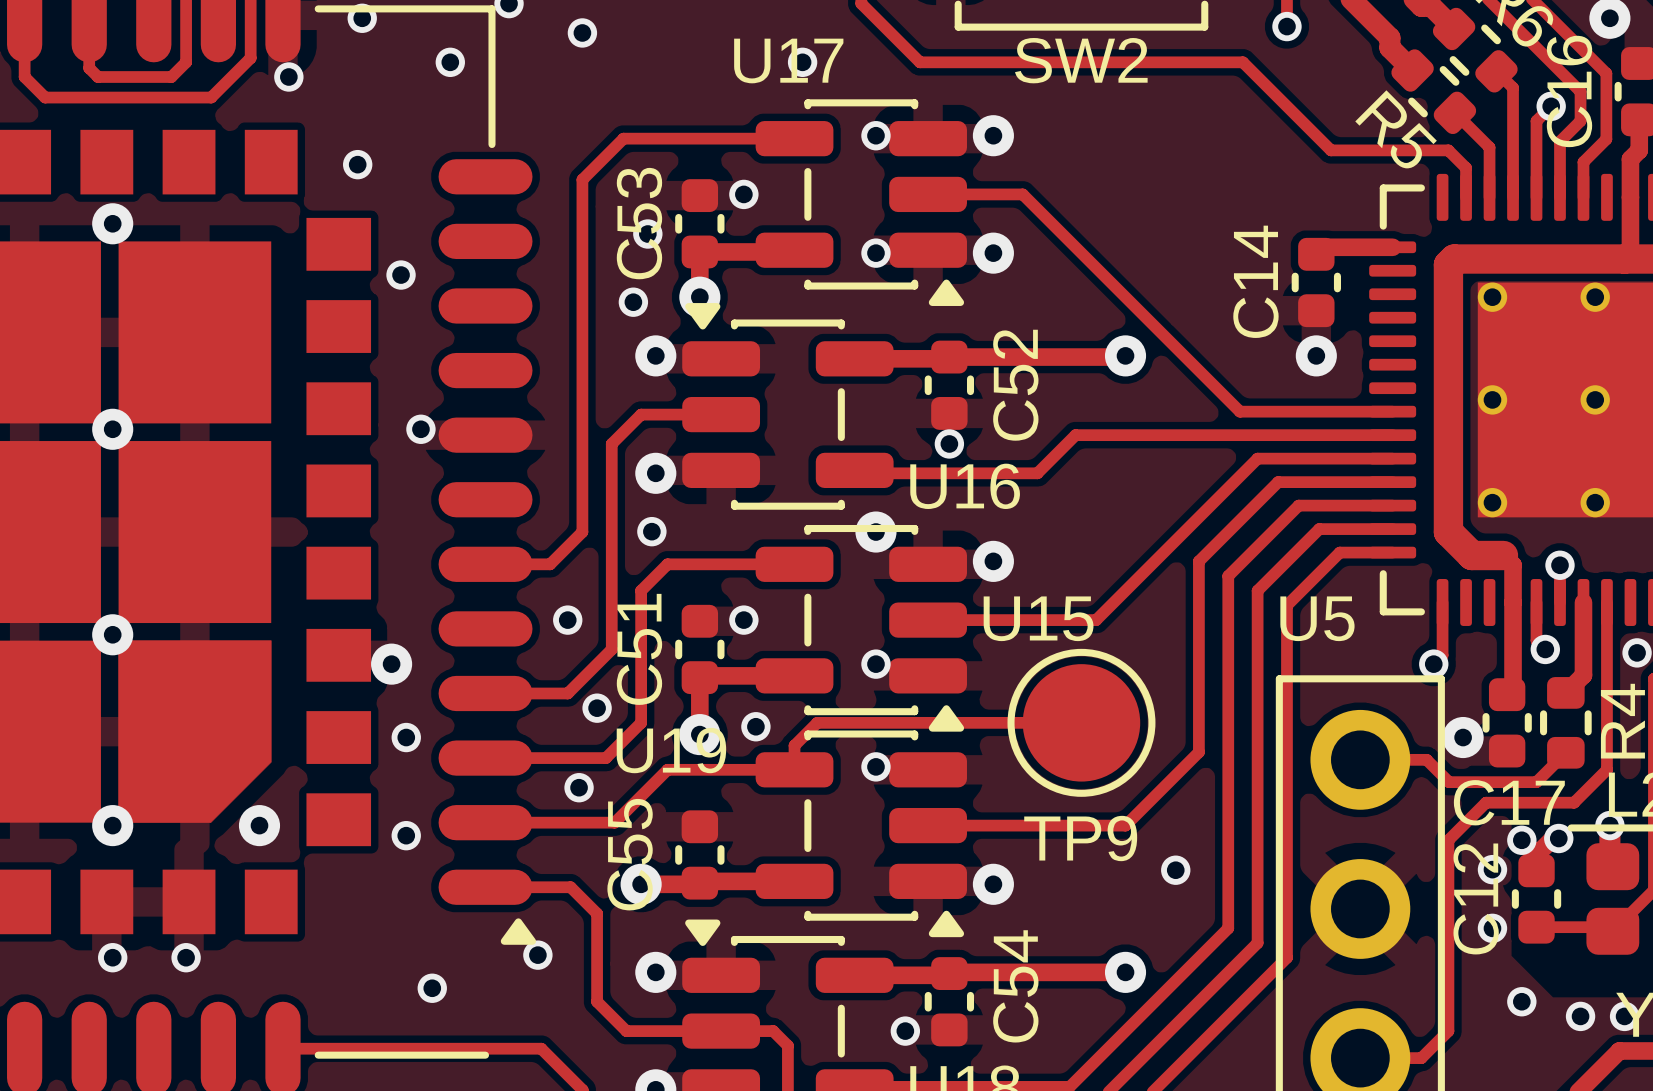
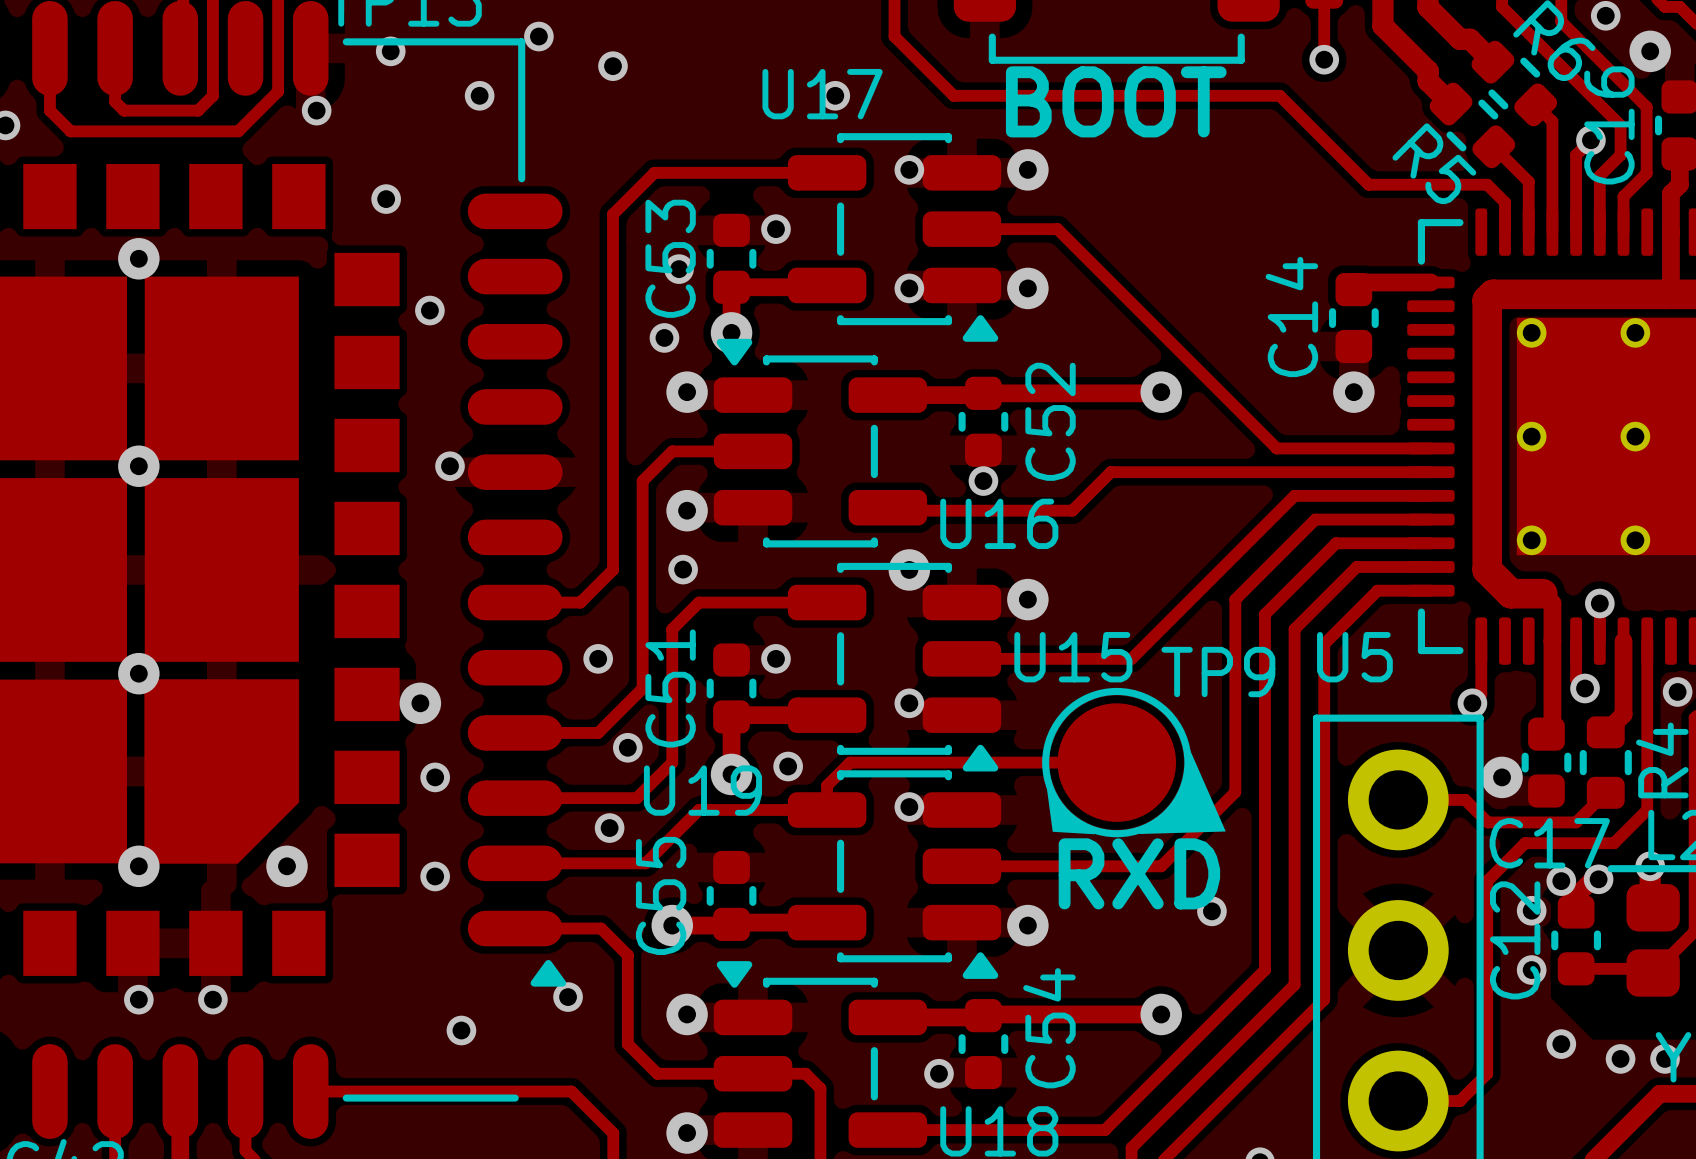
SW2 name: SW2 (1081, 60) -> none
text: none -> BOOT (1116, 101)
drawing: none -> [1044, 742, 1226, 835]
text: none -> RXD (1139, 873)
TP9 name position: TP9 (1080, 838) -> TP9 (1218, 672)

